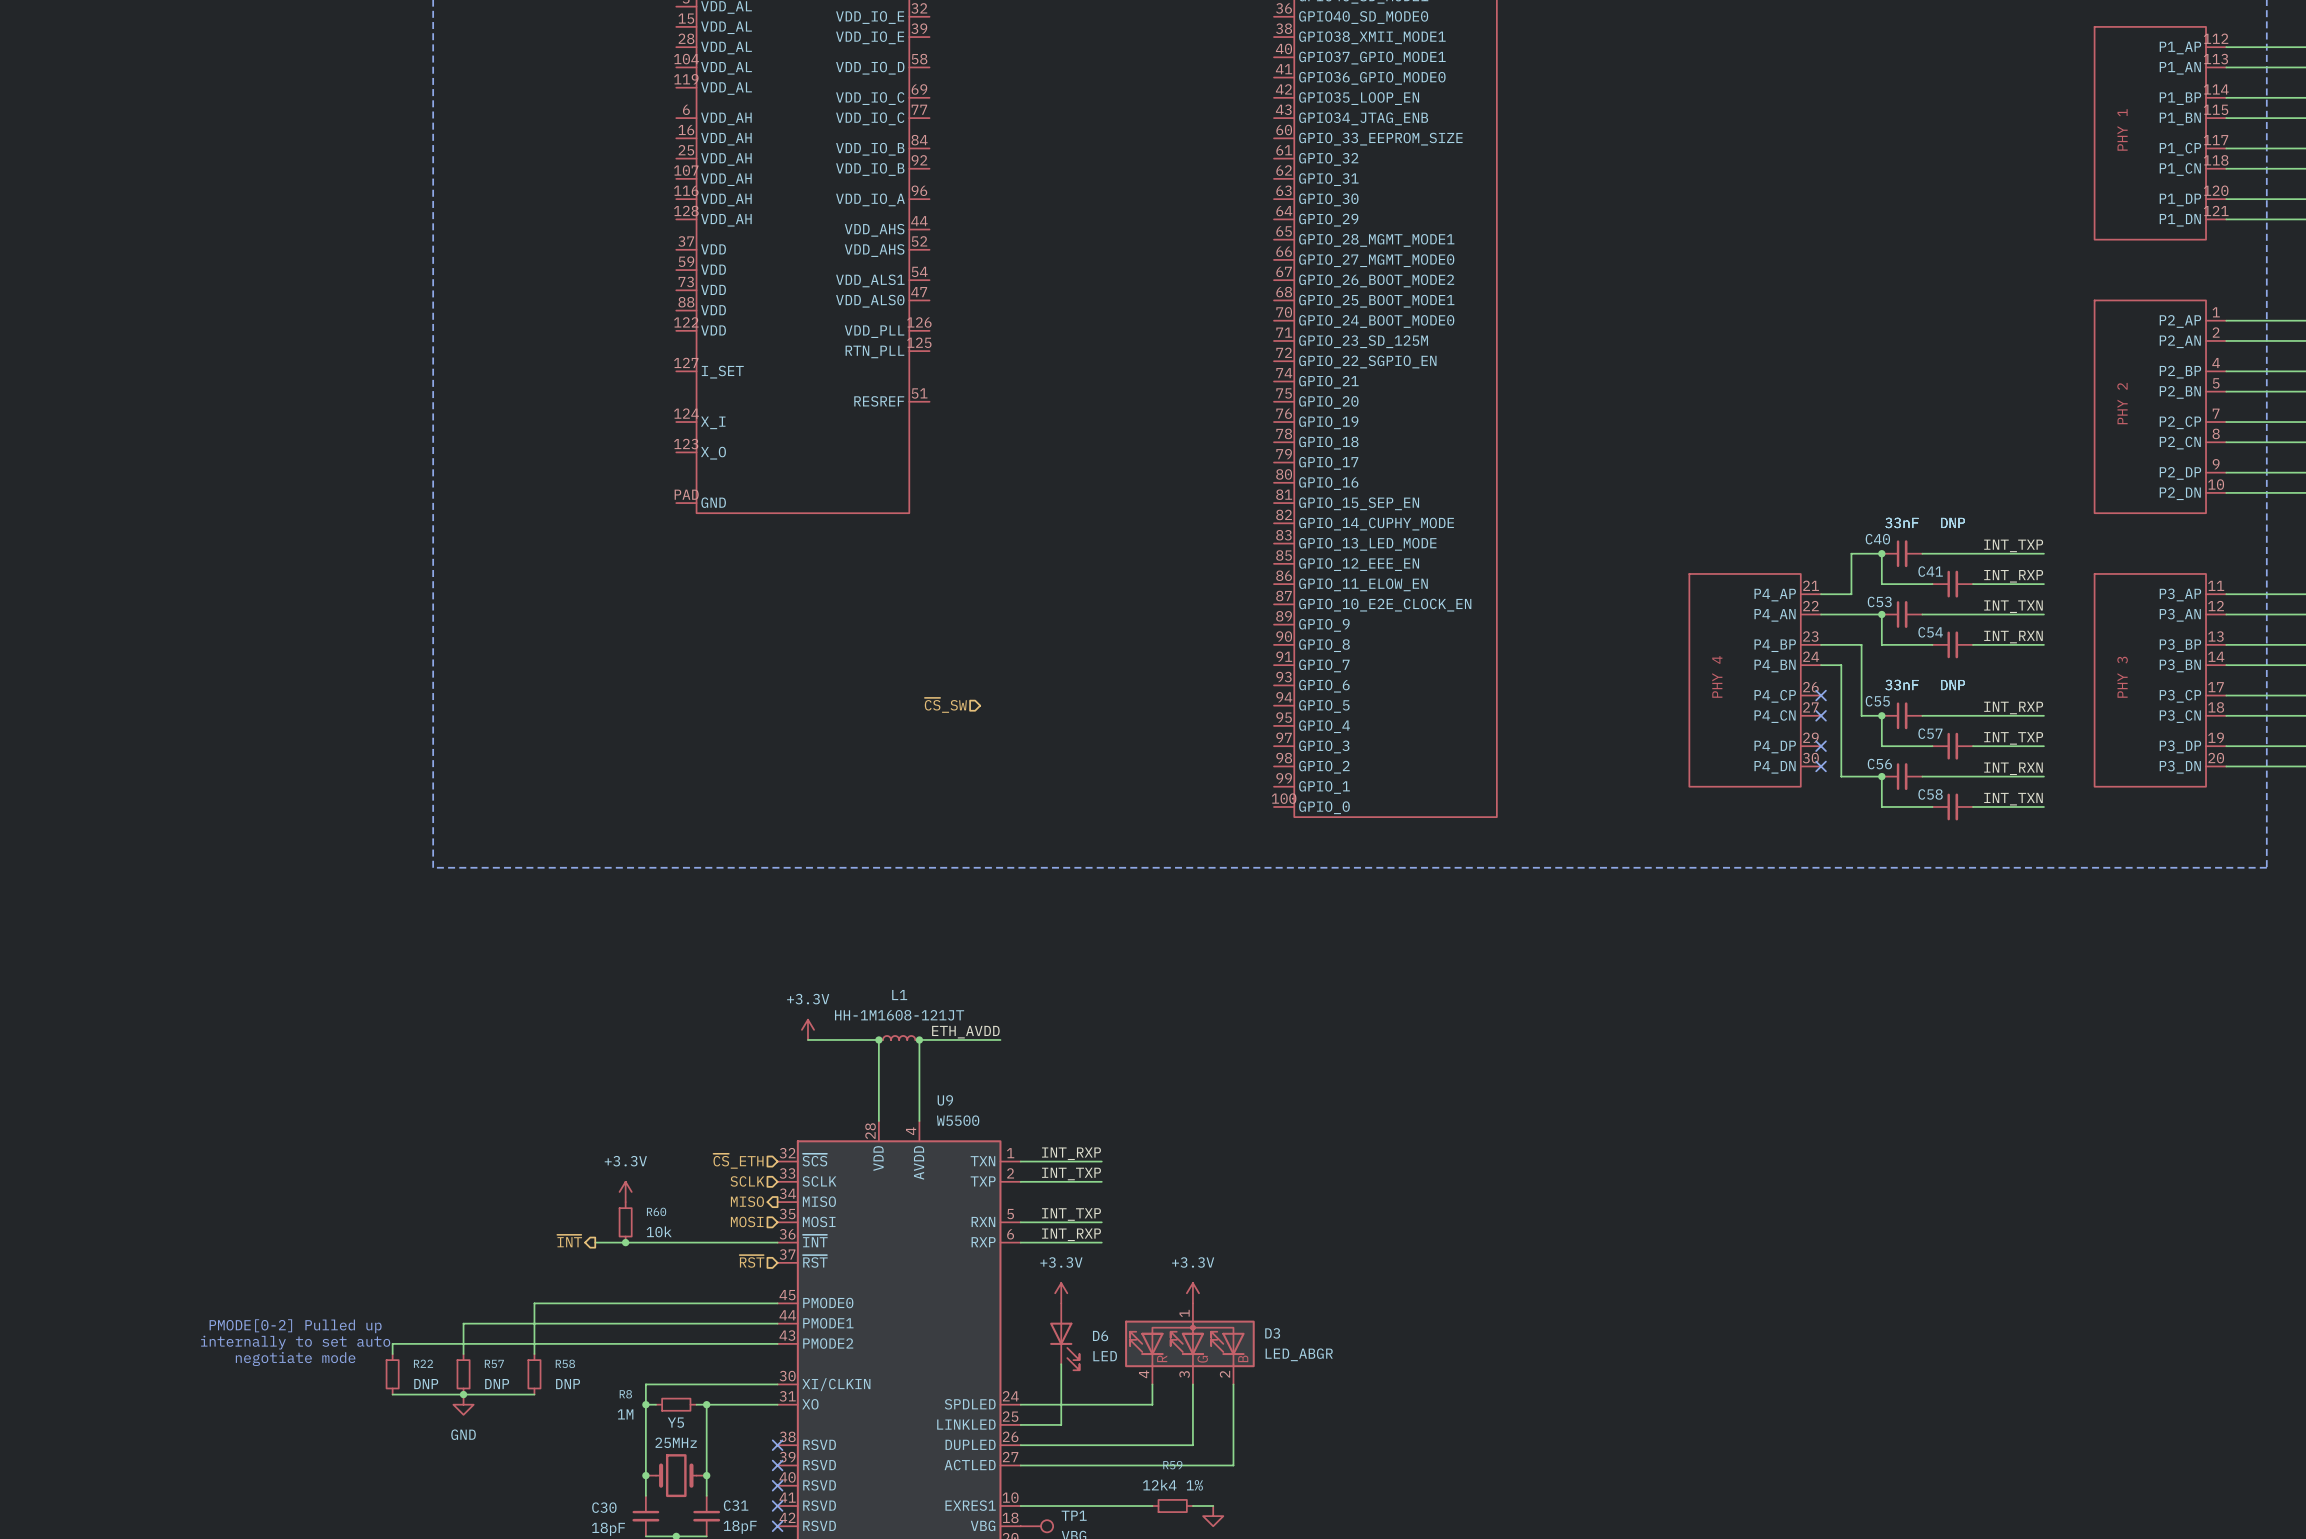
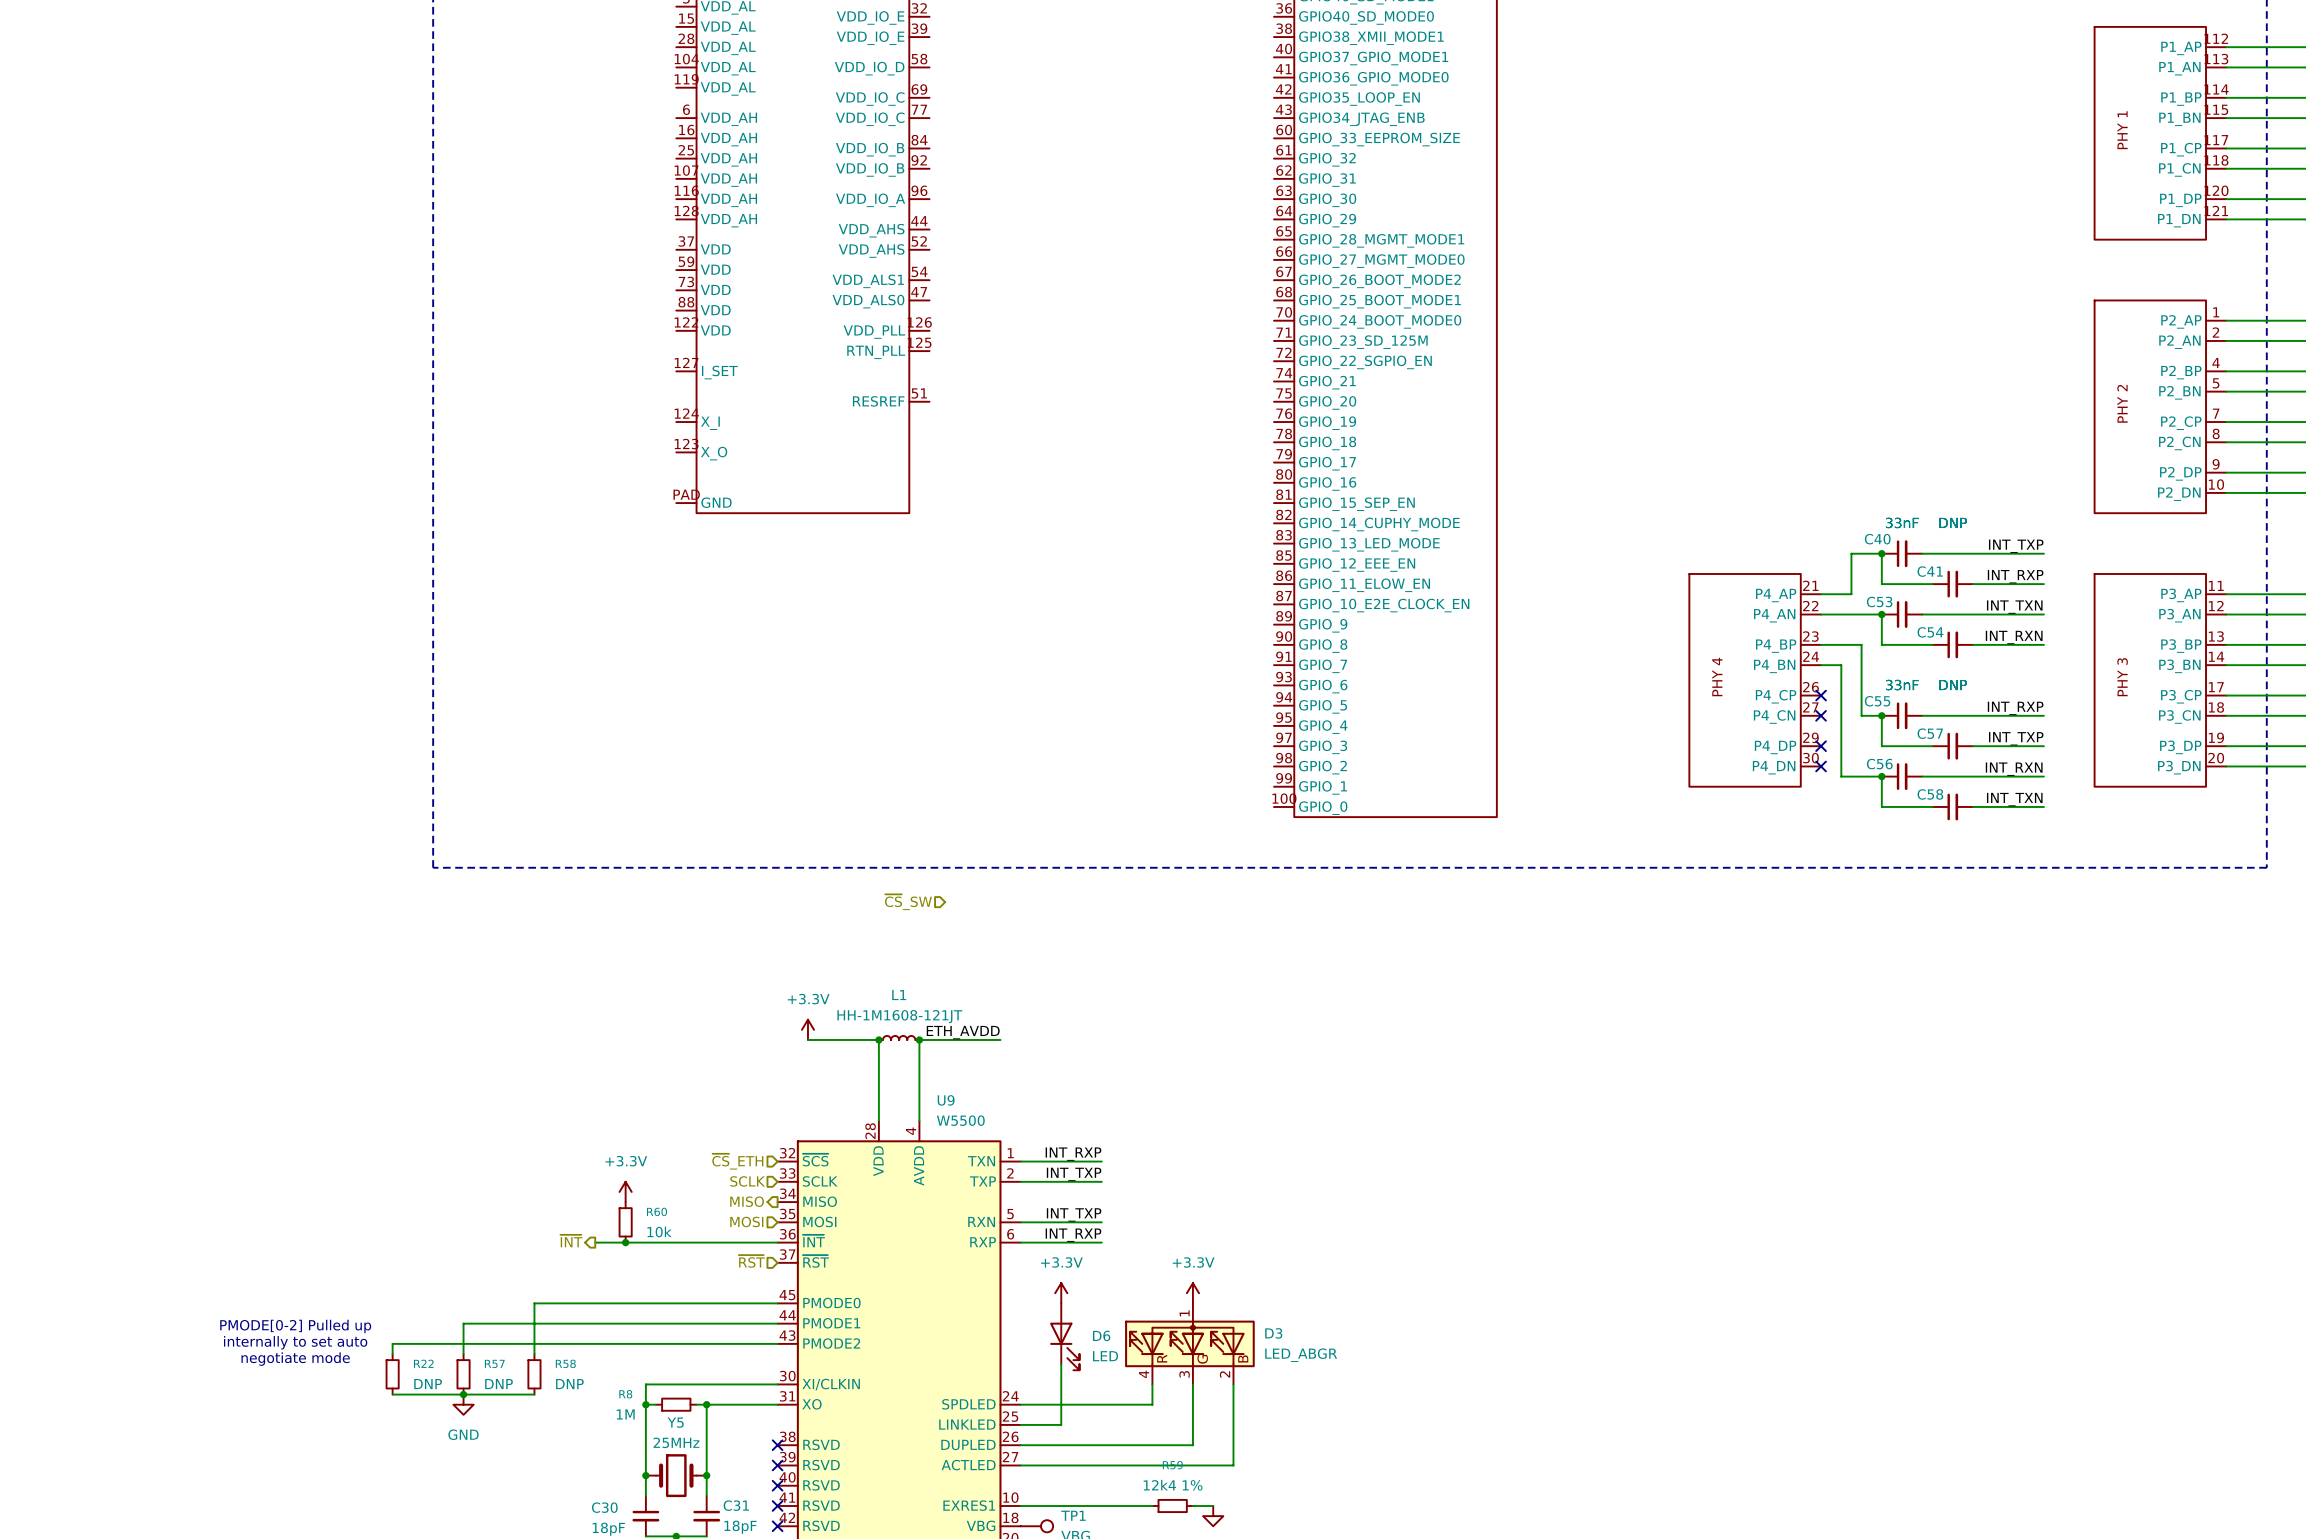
hierarchical label: ~{CS}_SW (945, 705) -> none
hierarchical label: none -> ~{CS}_SW (908, 902)

